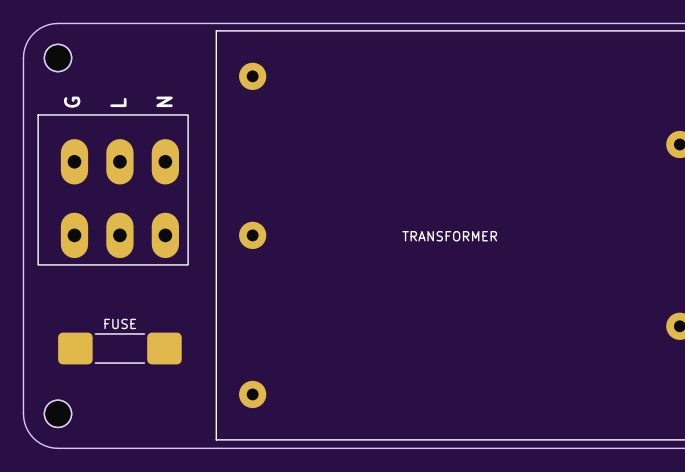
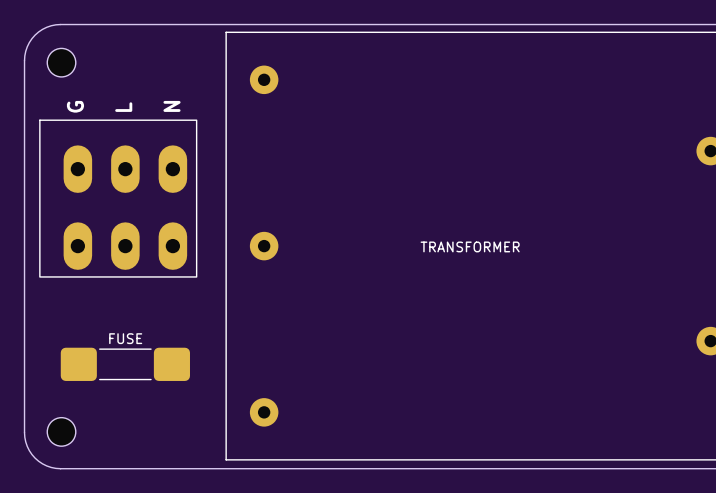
part footprint: [44, 44, 72, 72] -> [47, 48, 76, 77]
part footprint: [44, 399, 72, 428] -> [47, 417, 76, 447]

